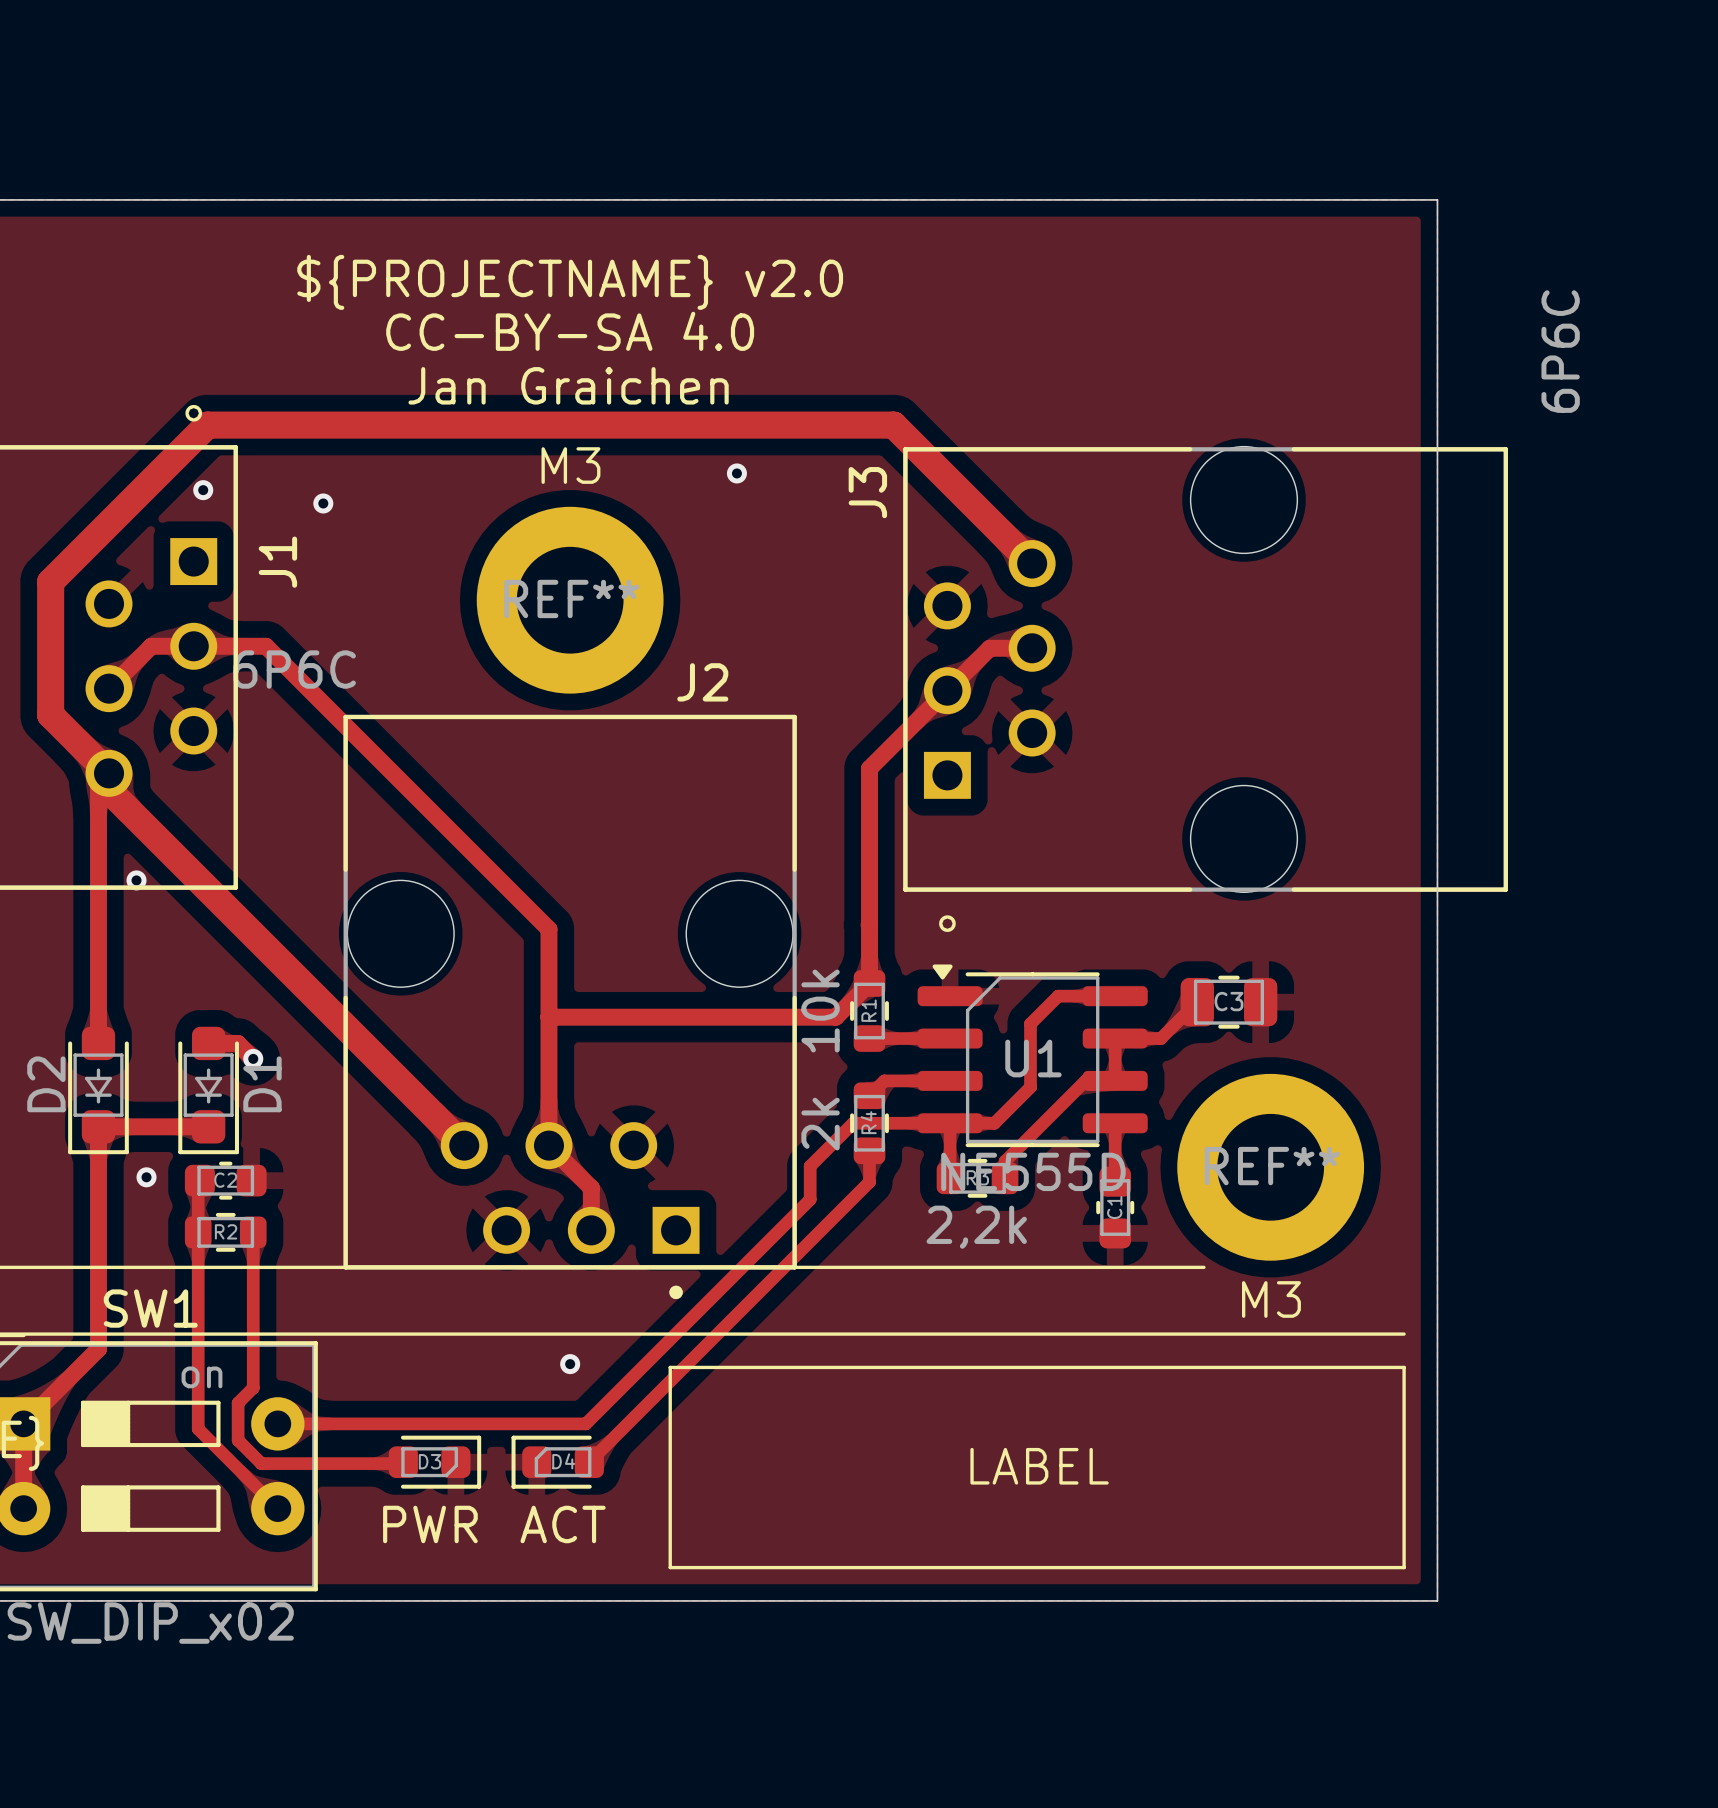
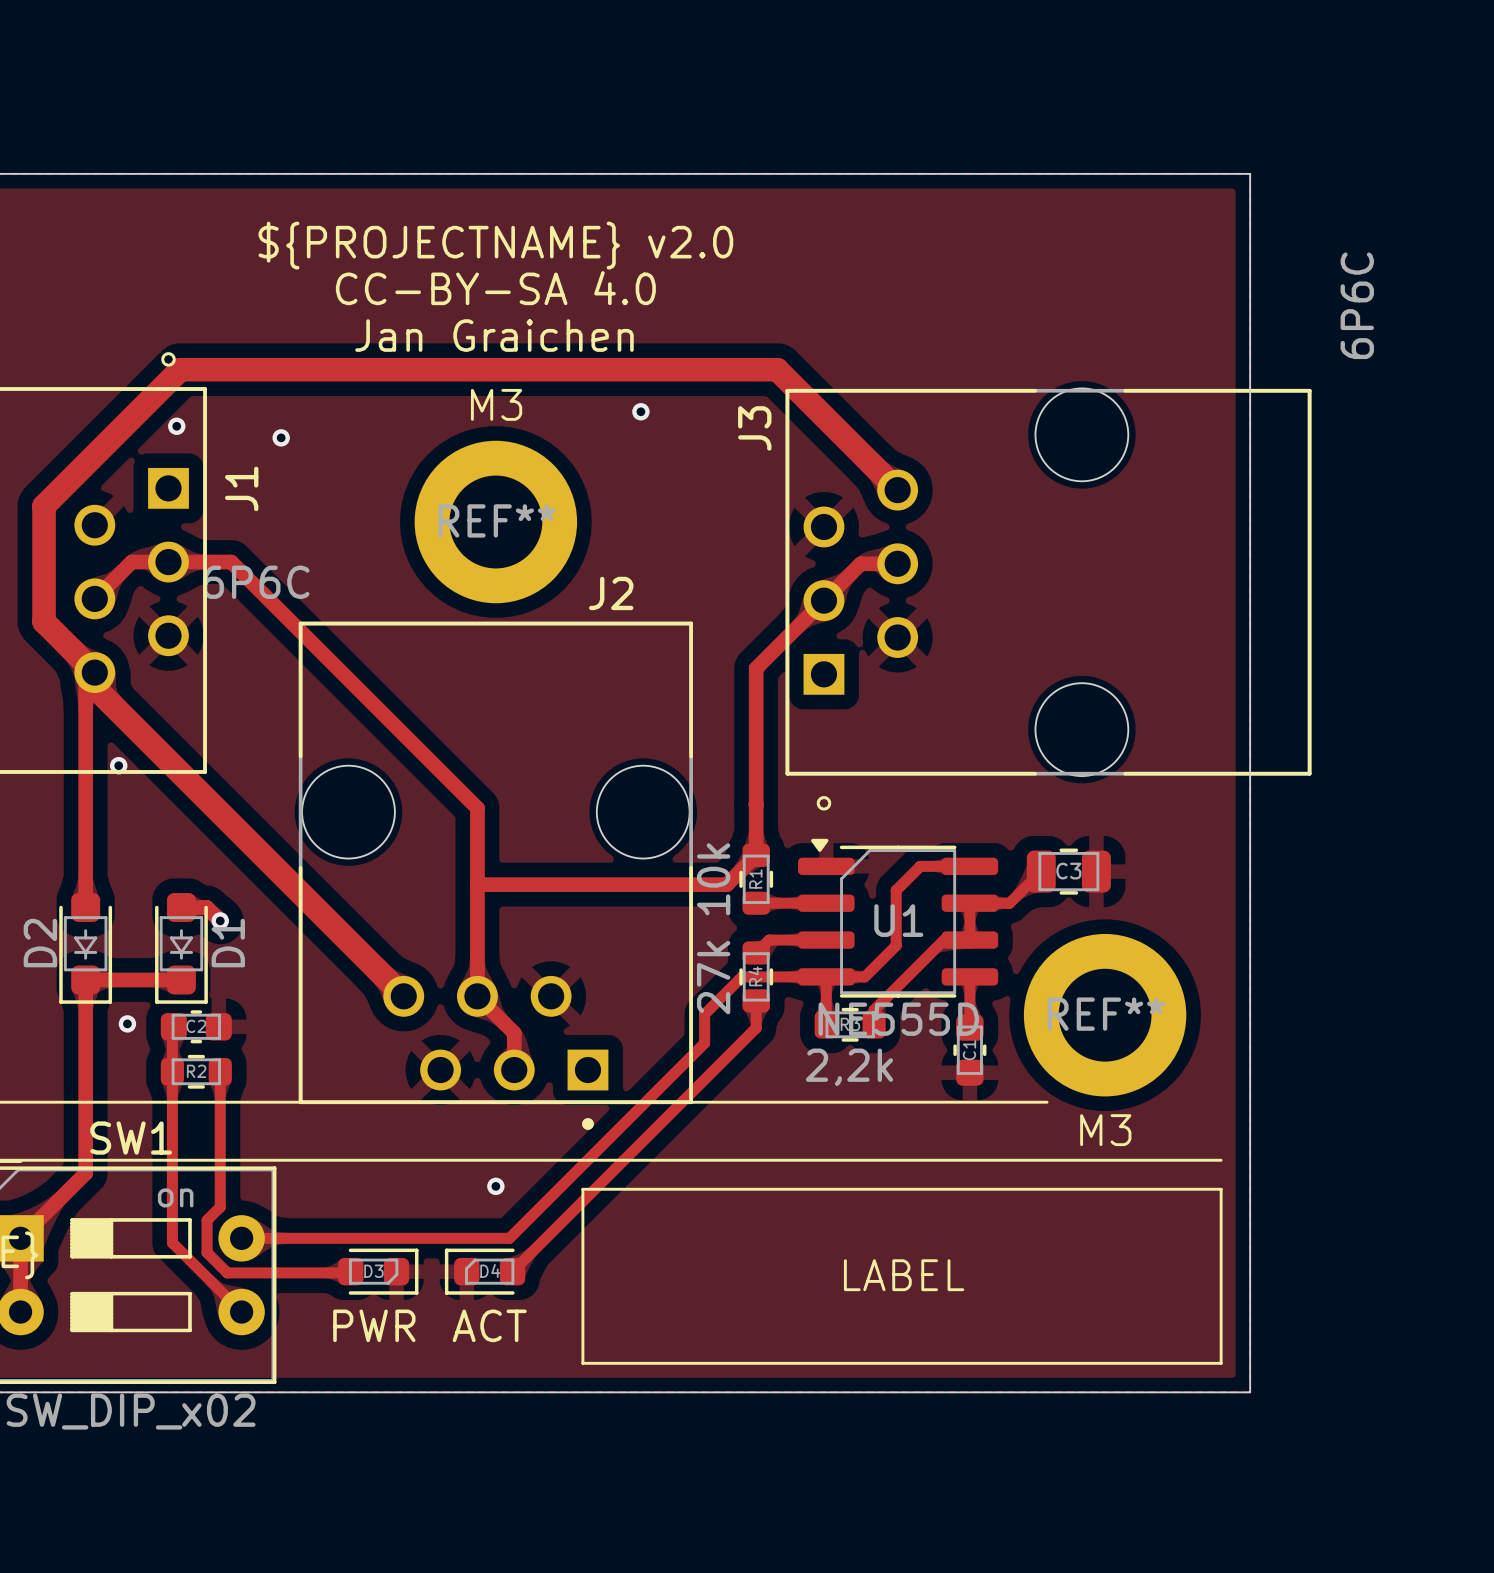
R4 value: 2k (820, 1124) -> 27k (713, 977)

